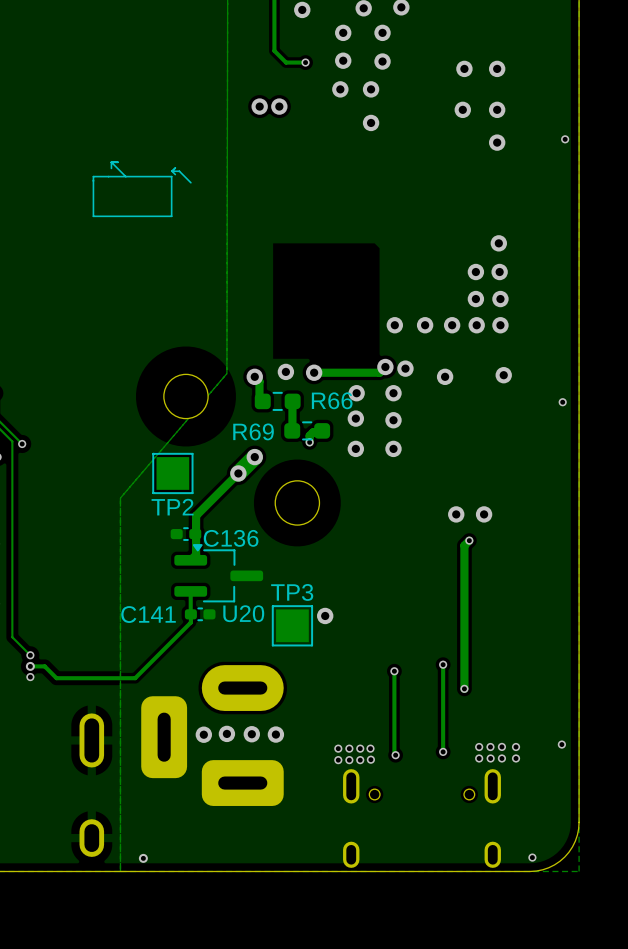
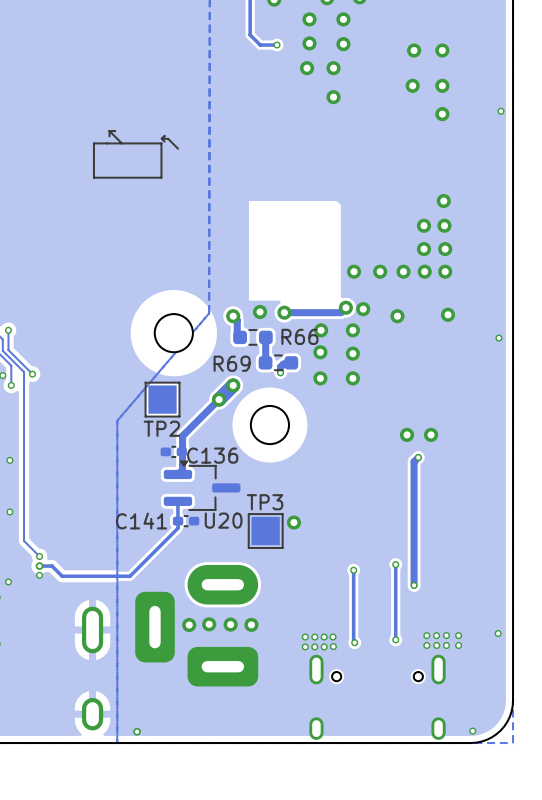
via: (259, 106) -> none
via: (279, 106) -> none

